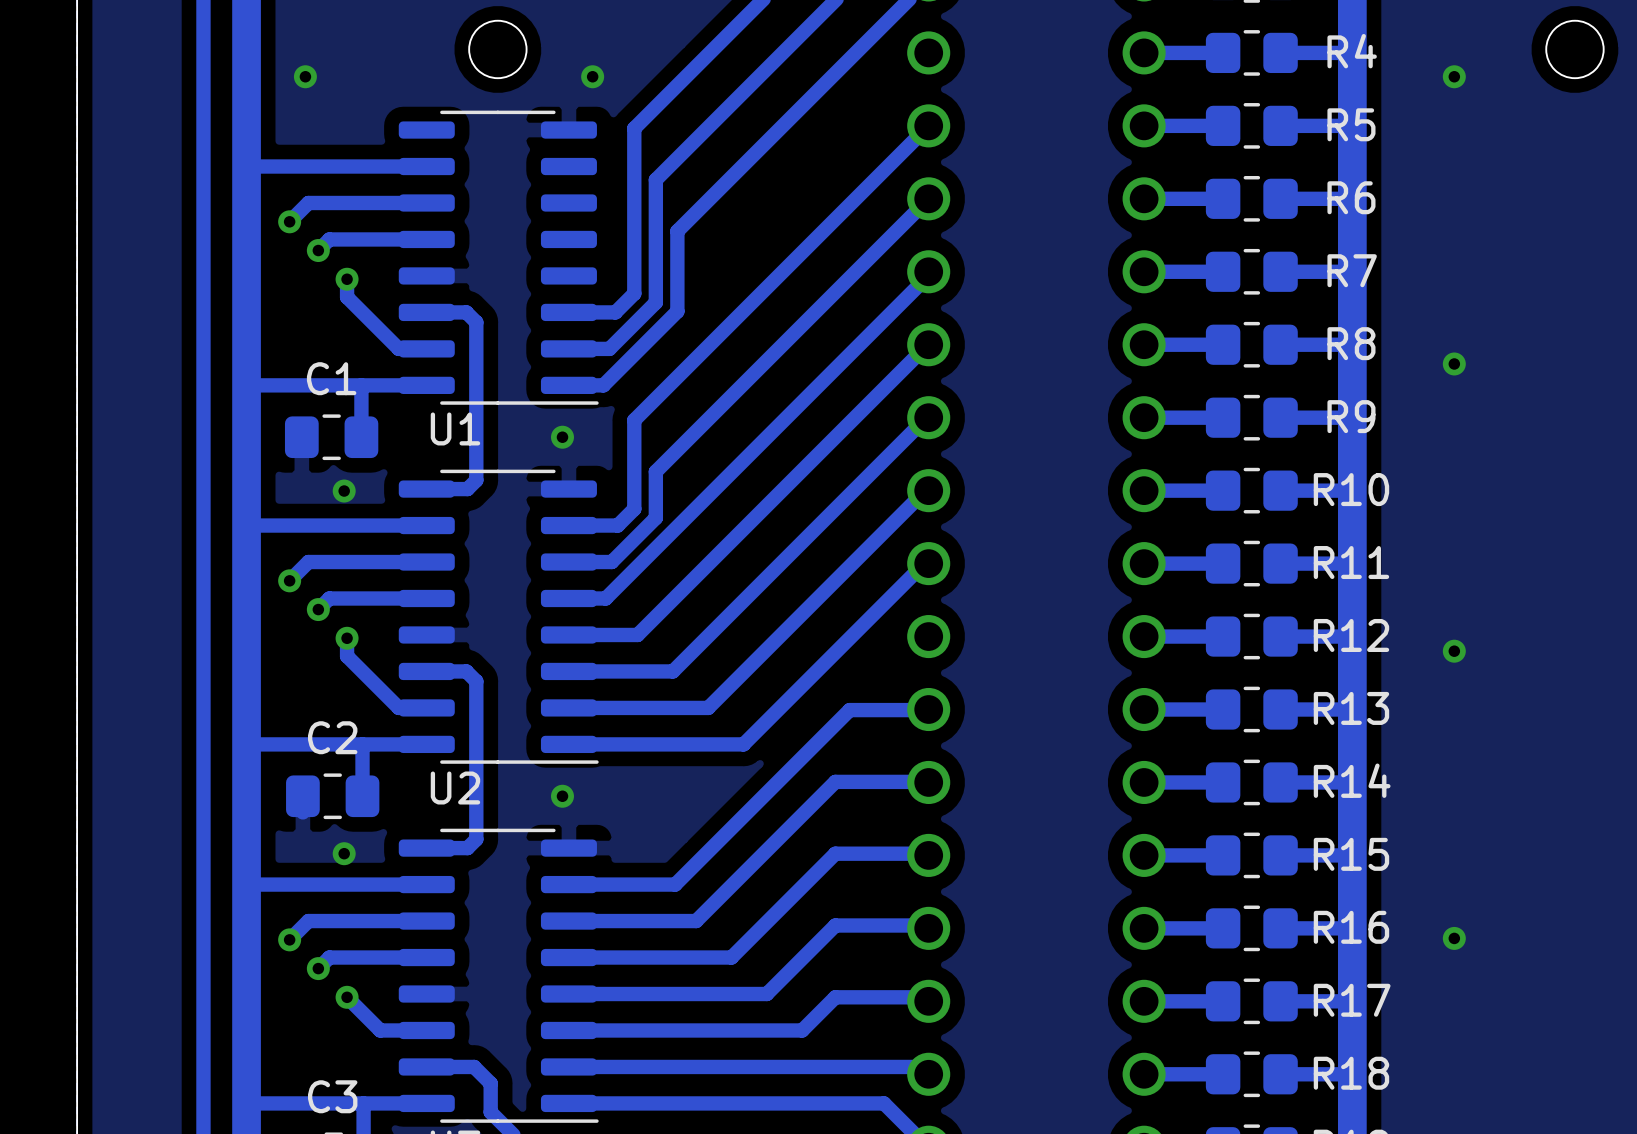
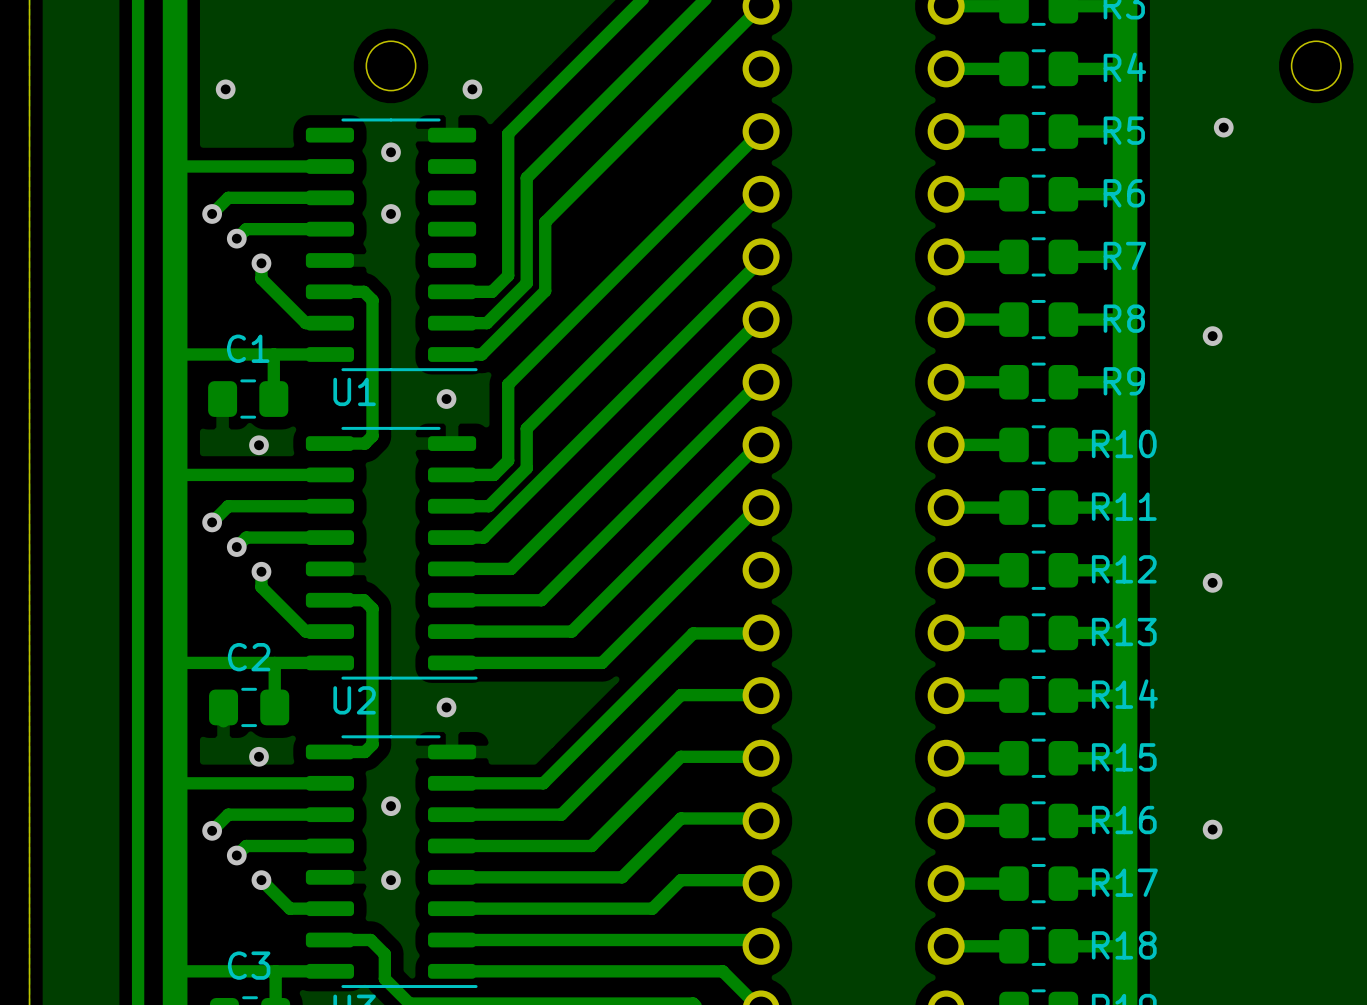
via position: (1454, 76) -> (1223, 127)
via: none -> (391, 152)
via: none -> (391, 213)
via: none -> (391, 806)
via: none -> (391, 880)

